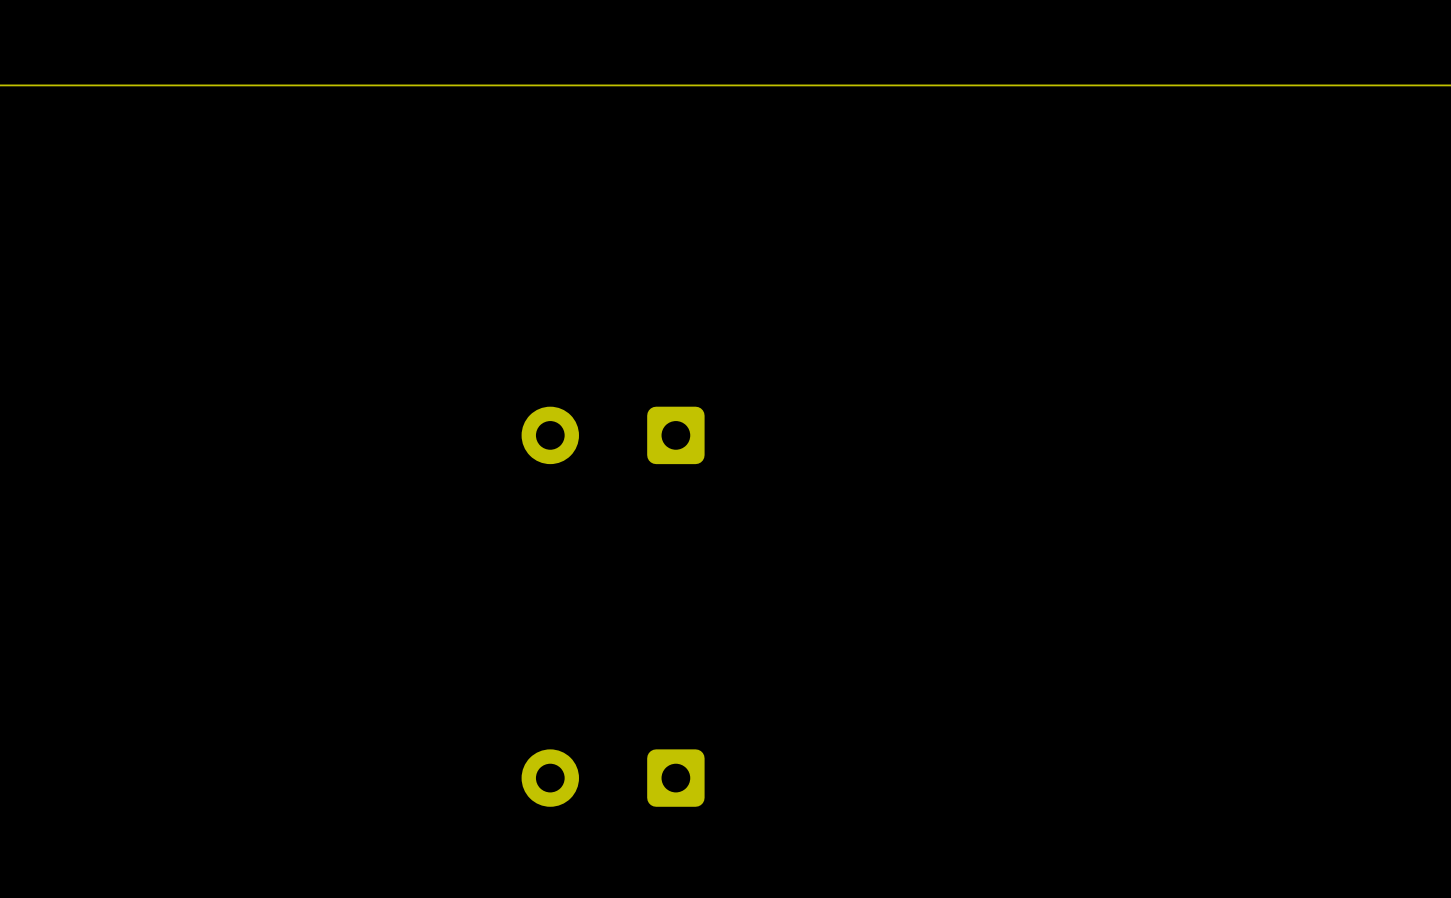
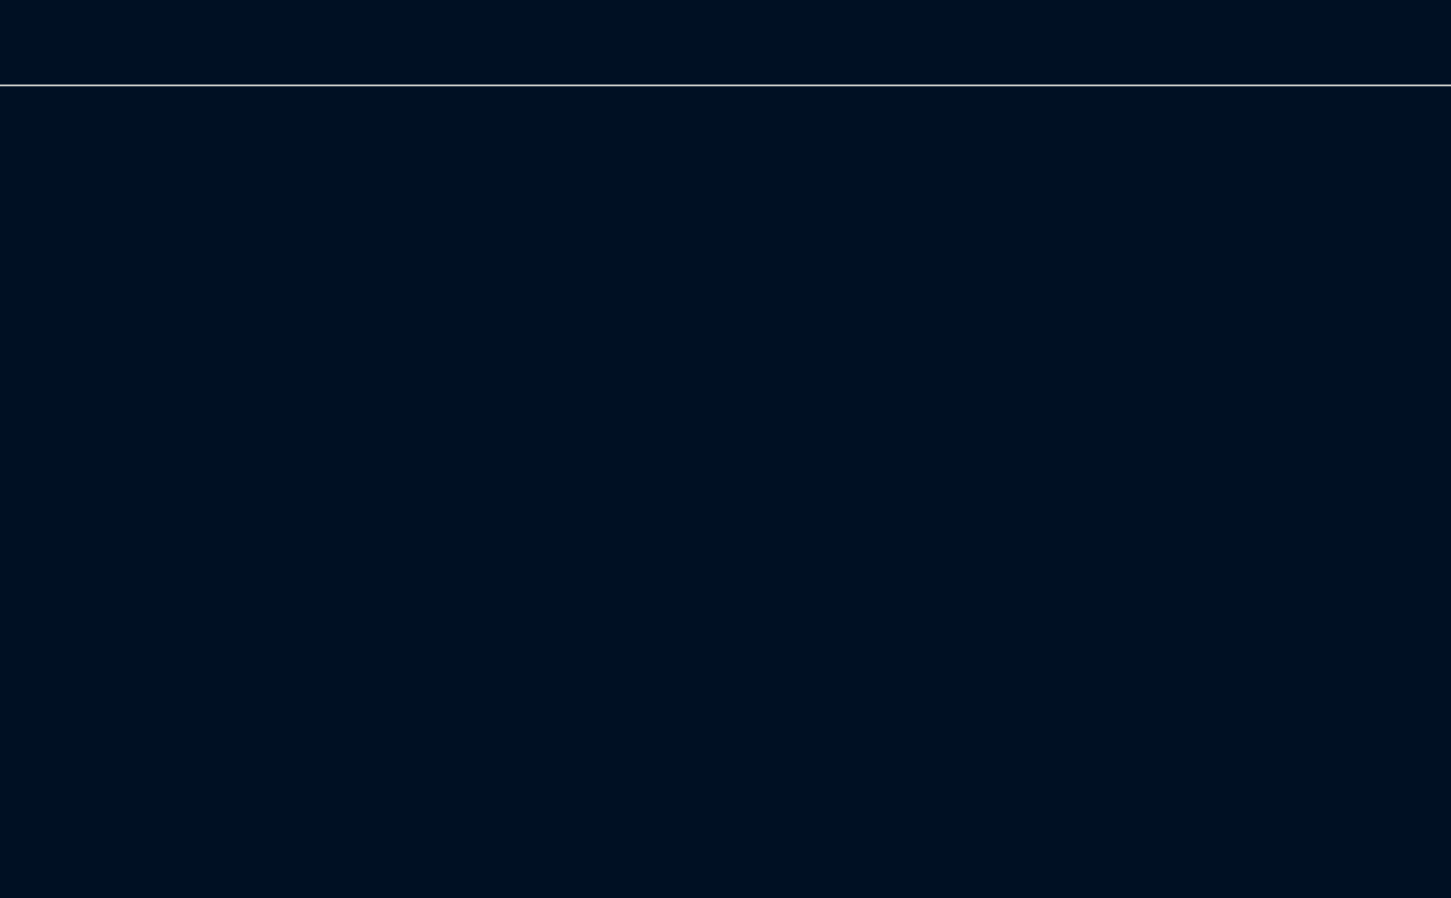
part: (613, 435) -> none
part: (613, 778) -> none

